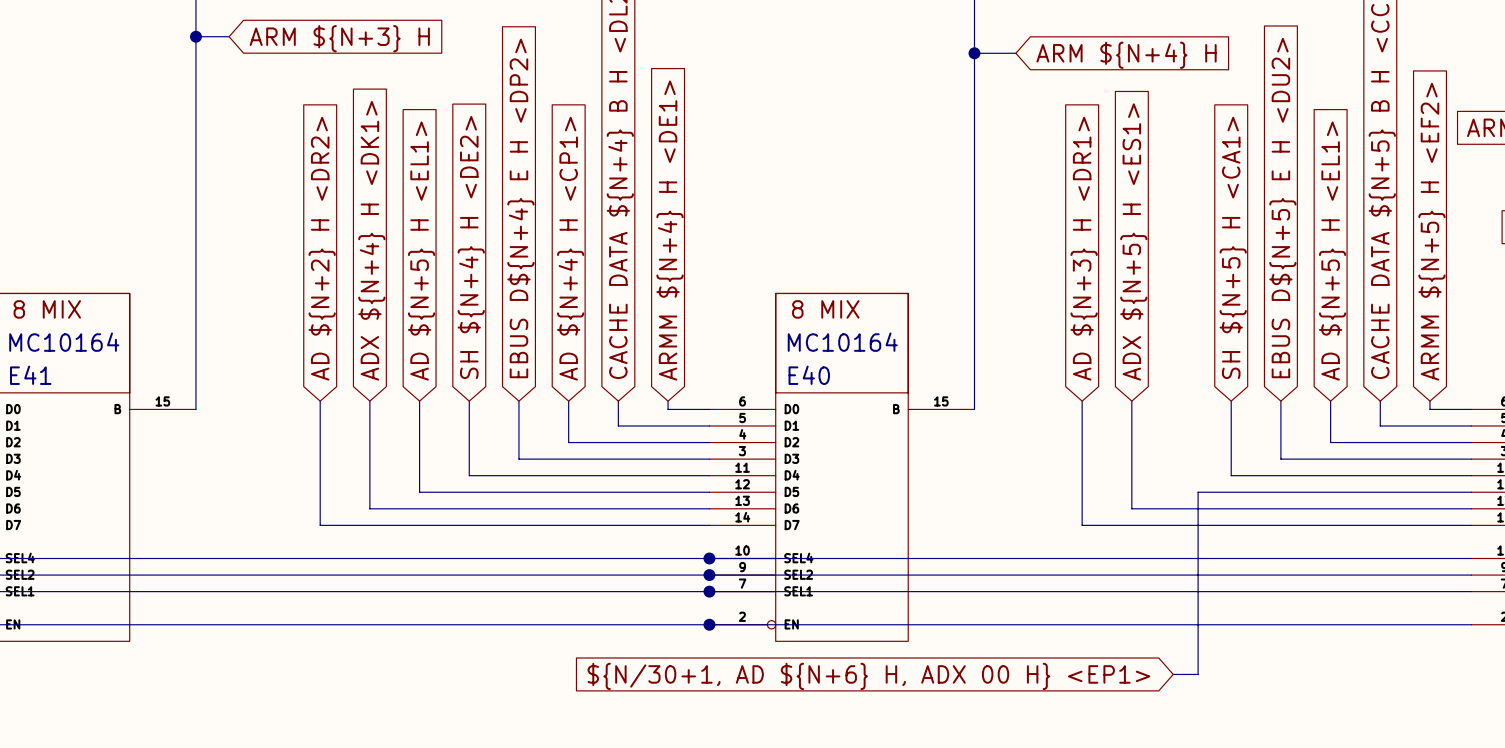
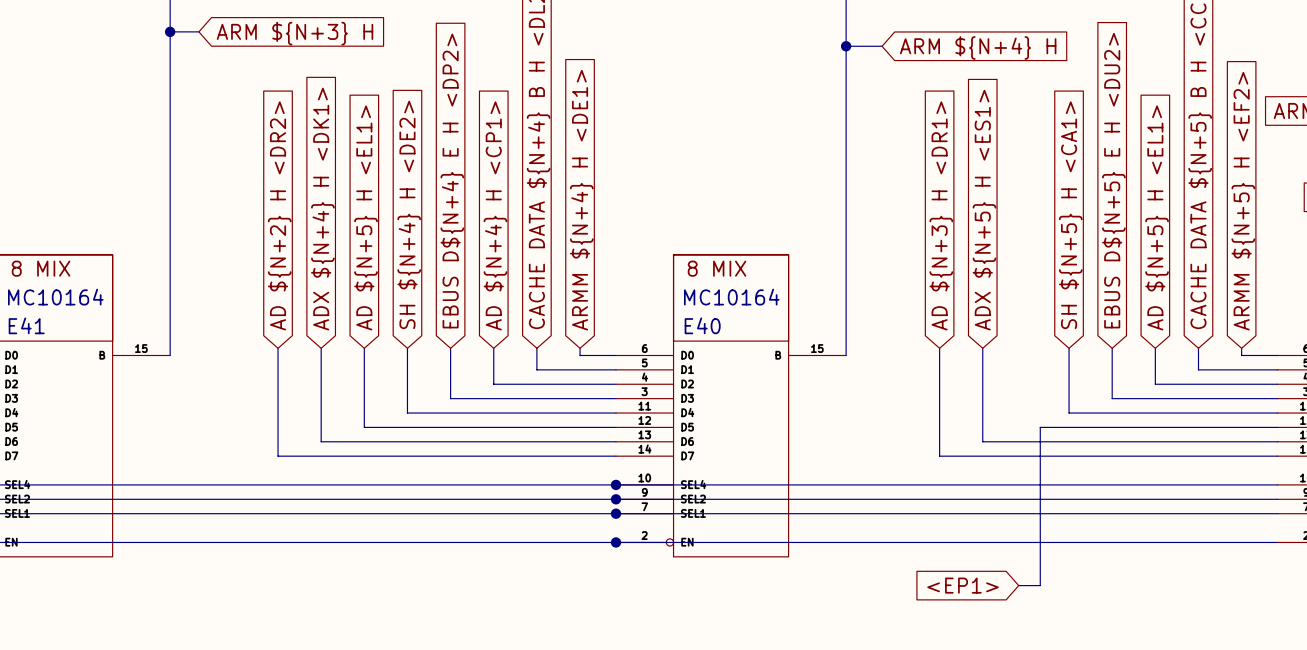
global label: ${N/30+1, AD ${N+6} H, ADX 00 H} <EP1> (868, 676) -> <EP1> (963, 585)

